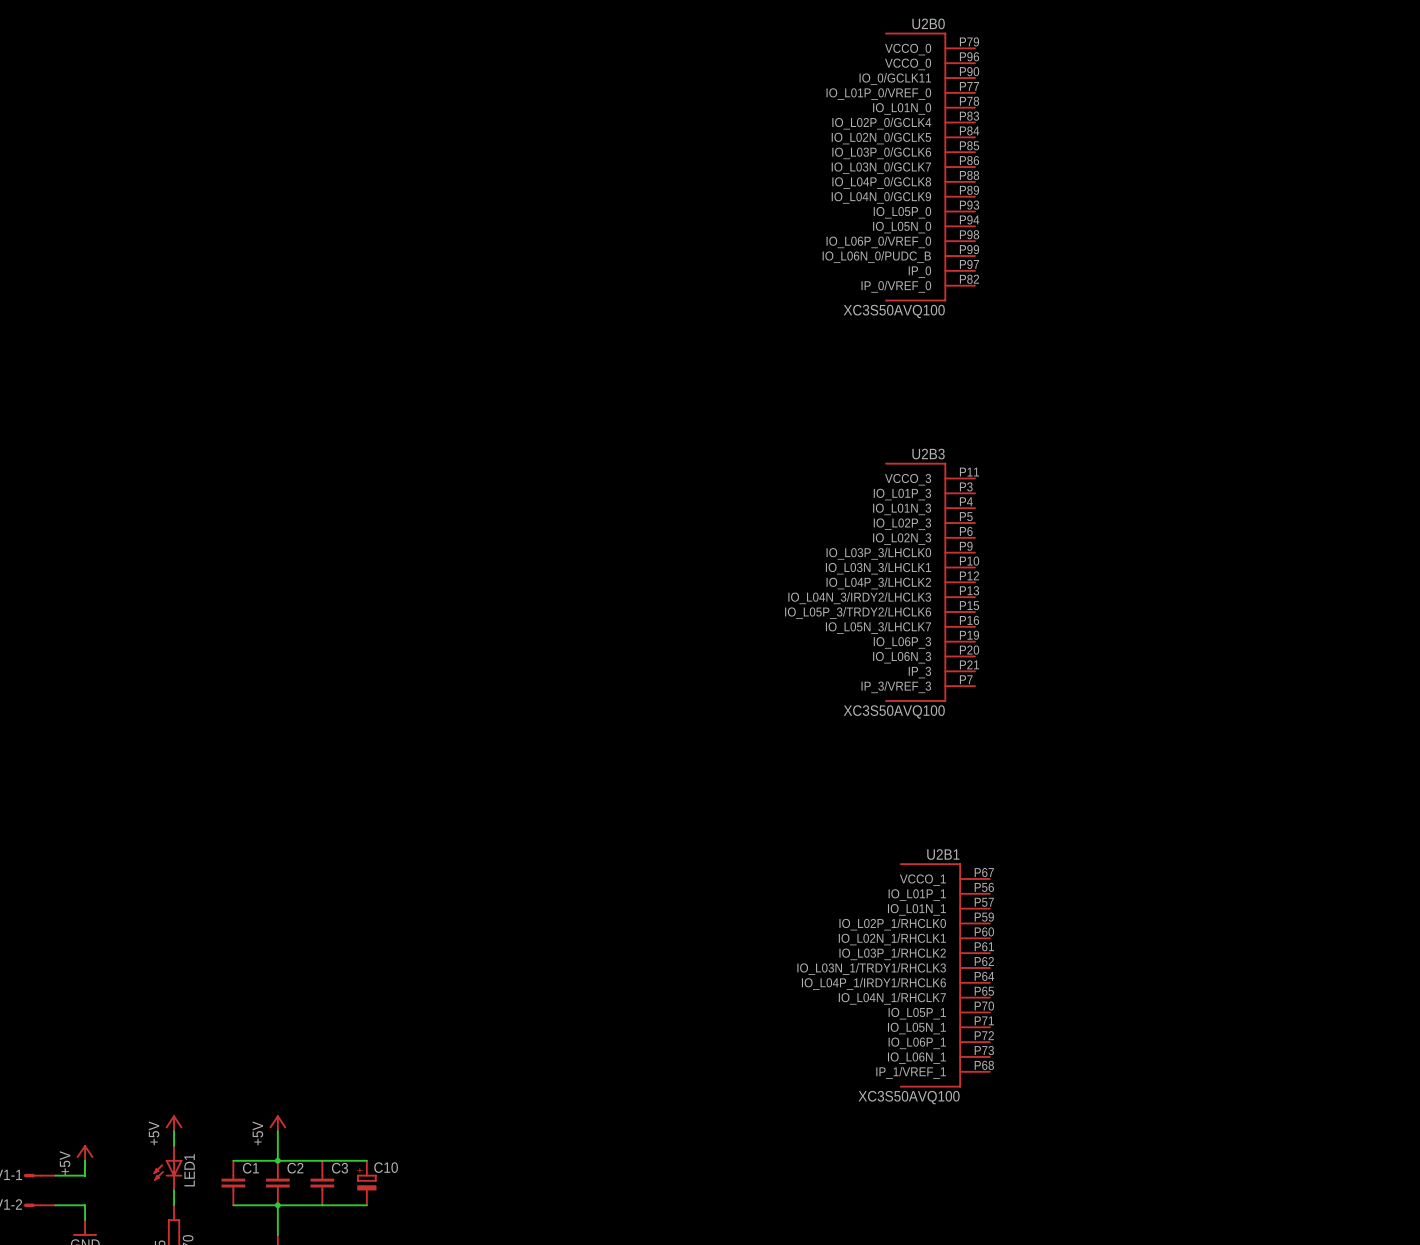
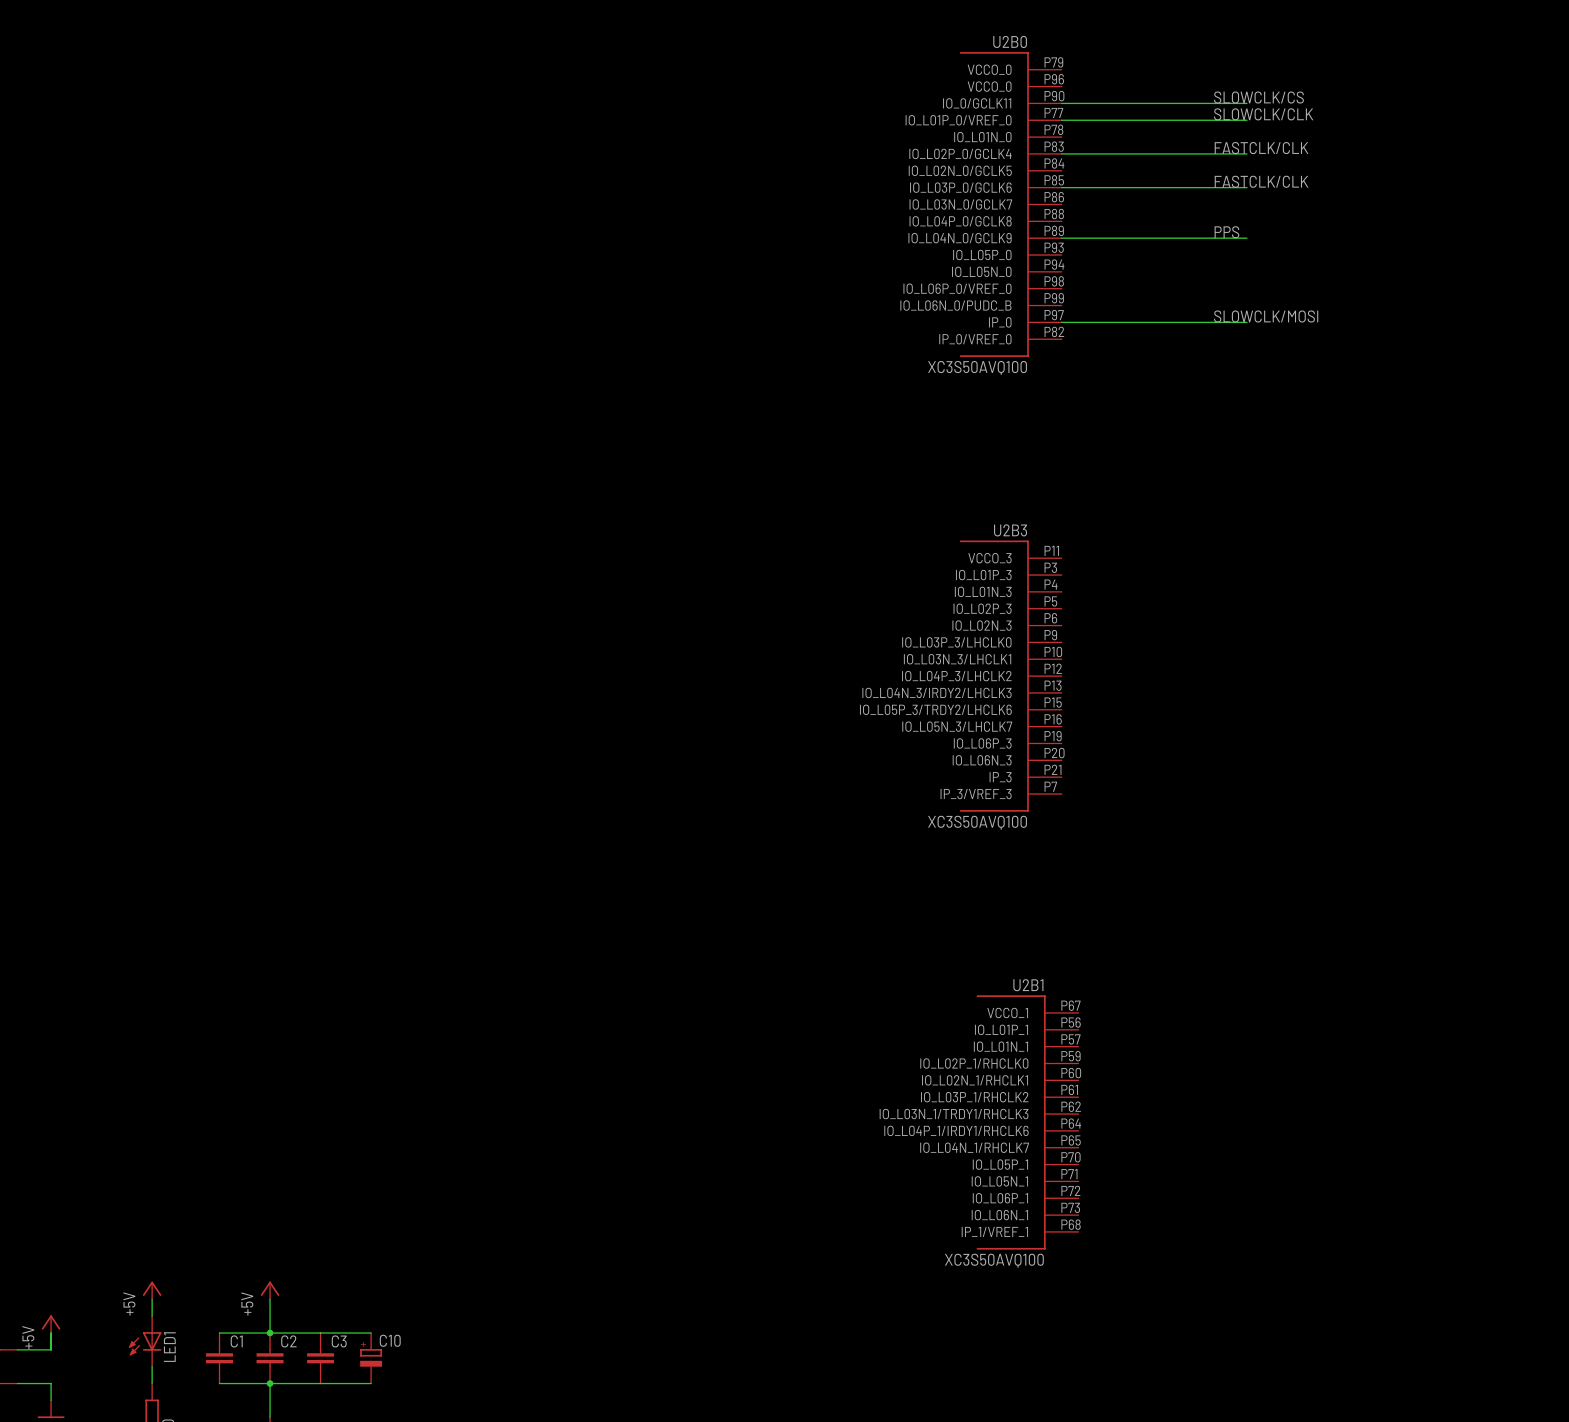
label: none -> SLOWCLK/CS (1258, 97)
wire: none -> (1061, 103) (1246, 103)
label: none -> SLOWCLK/CLK (1263, 114)
wire: none -> (1061, 120) (1246, 120)
label: none -> FASTCLK/CLK (1261, 148)
wire: none -> (1061, 153) (1246, 153)
label: none -> FASTCLK/CLK (1261, 181)
wire: none -> (1061, 187) (1246, 187)
label: none -> PPS (1226, 232)
wire: none -> (1061, 238) (1246, 238)
label: none -> SLOWCLK/MOSI (1266, 316)
wire: none -> (1061, 322) (1246, 322)

